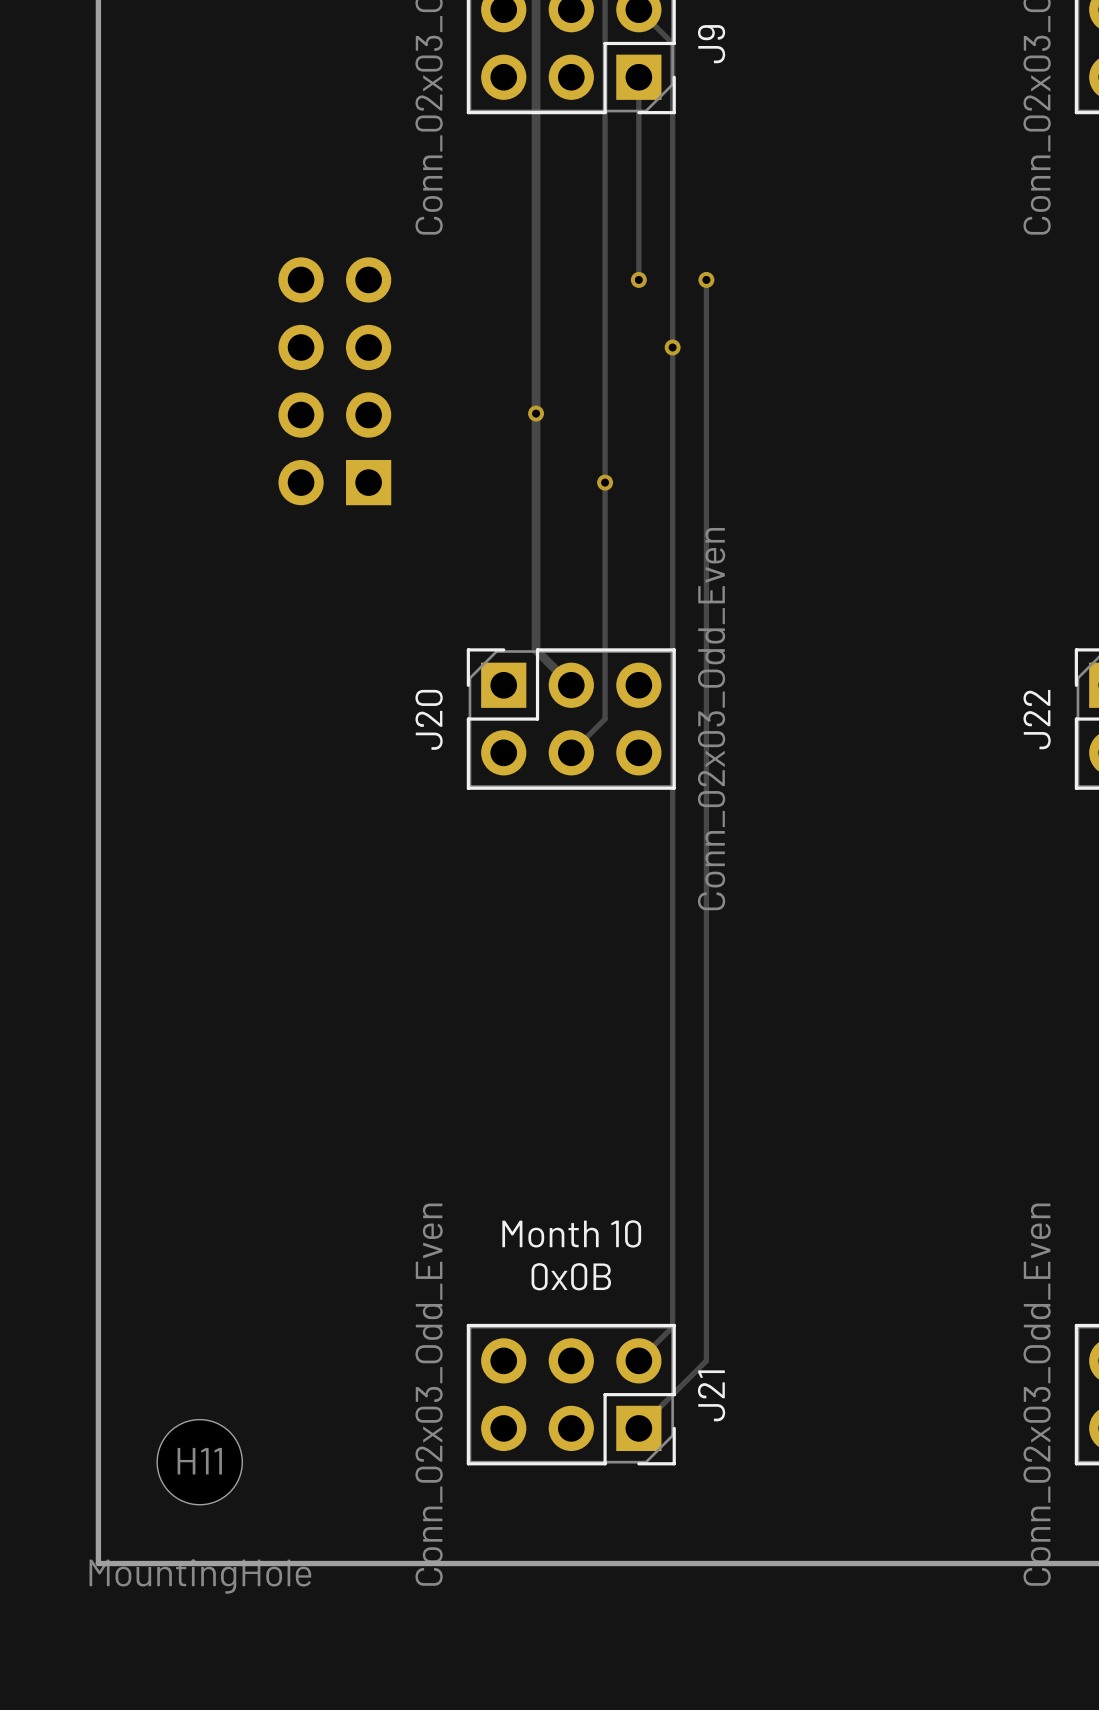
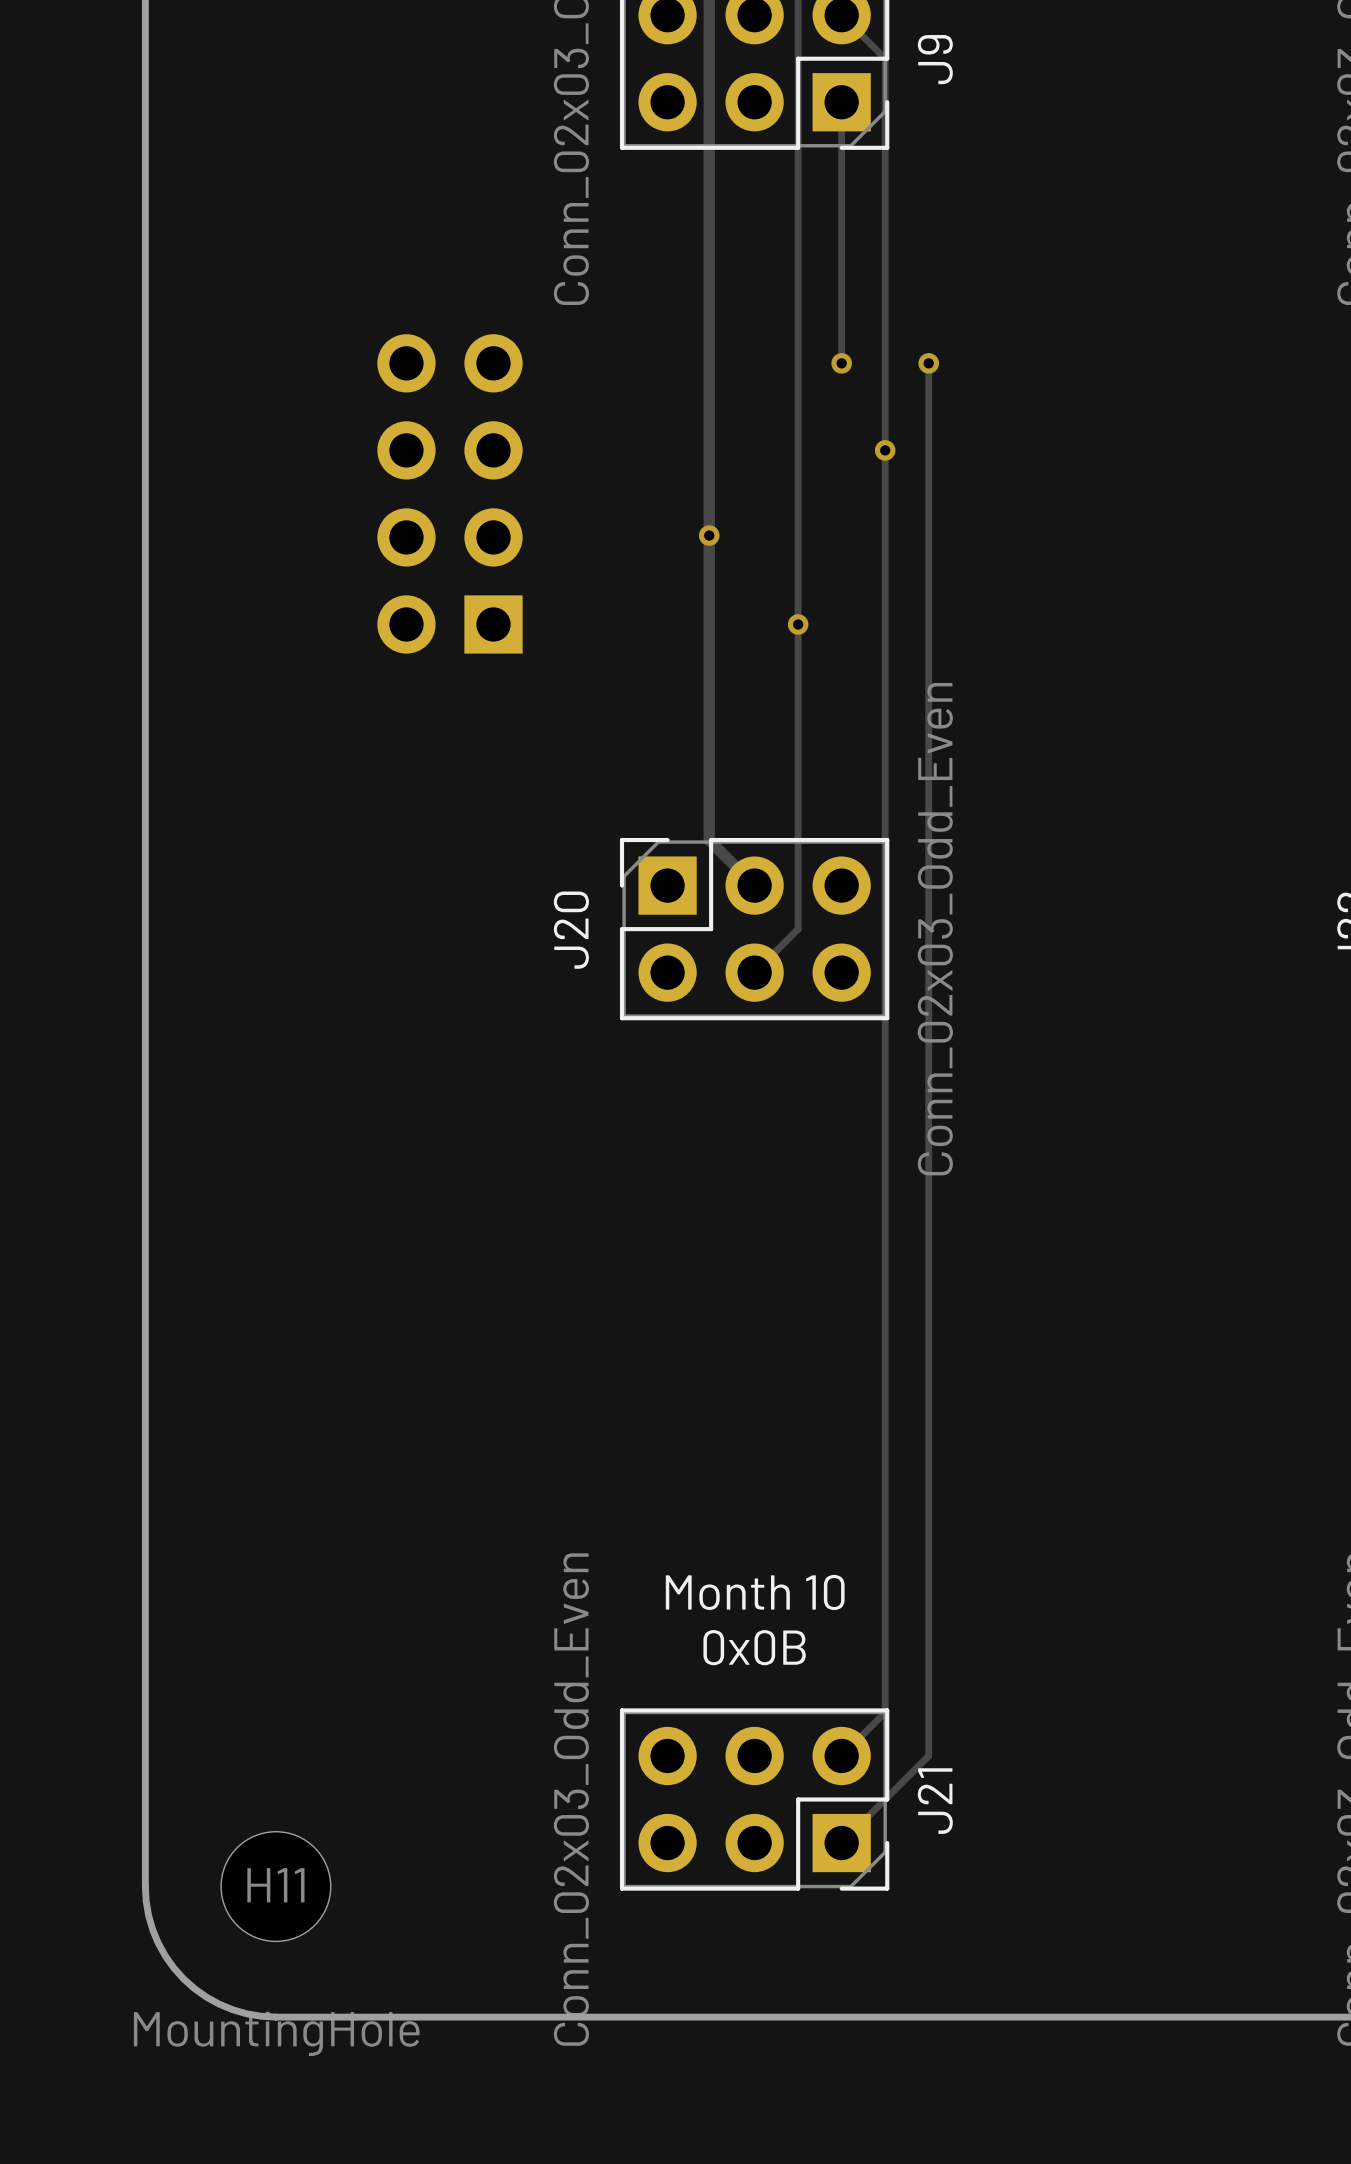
board edge: (98, 1462) (98, 1563) (199, 1563) -> (145, 1886) (146, 1901) (152, 1929) (165, 1956) (183, 1978) (206, 1997) (232, 2009) (246, 2013) (275, 2017)

